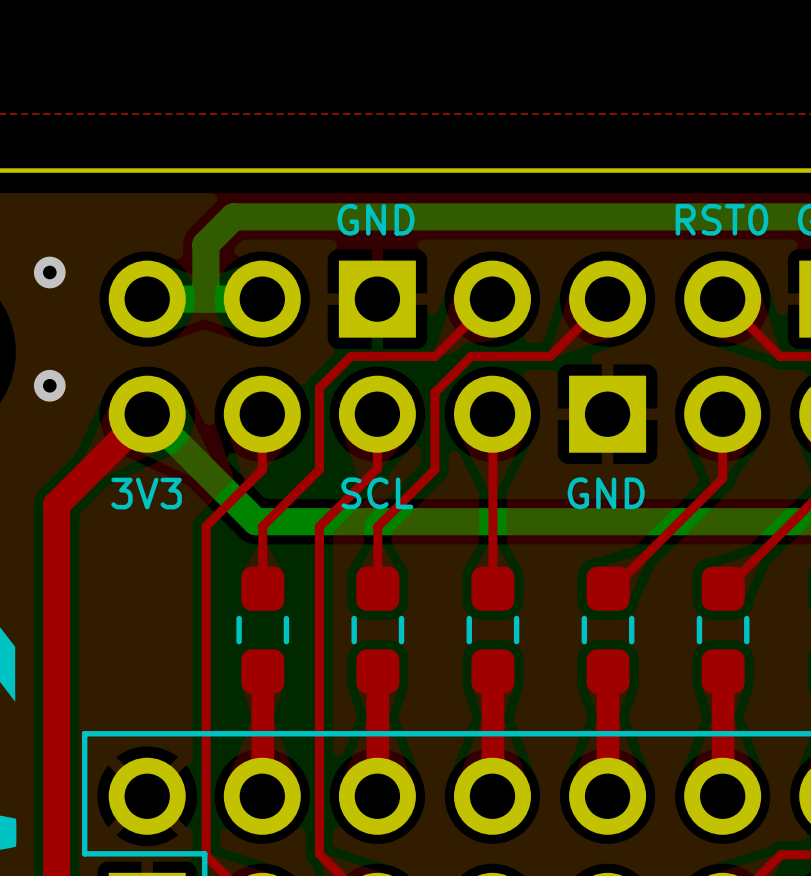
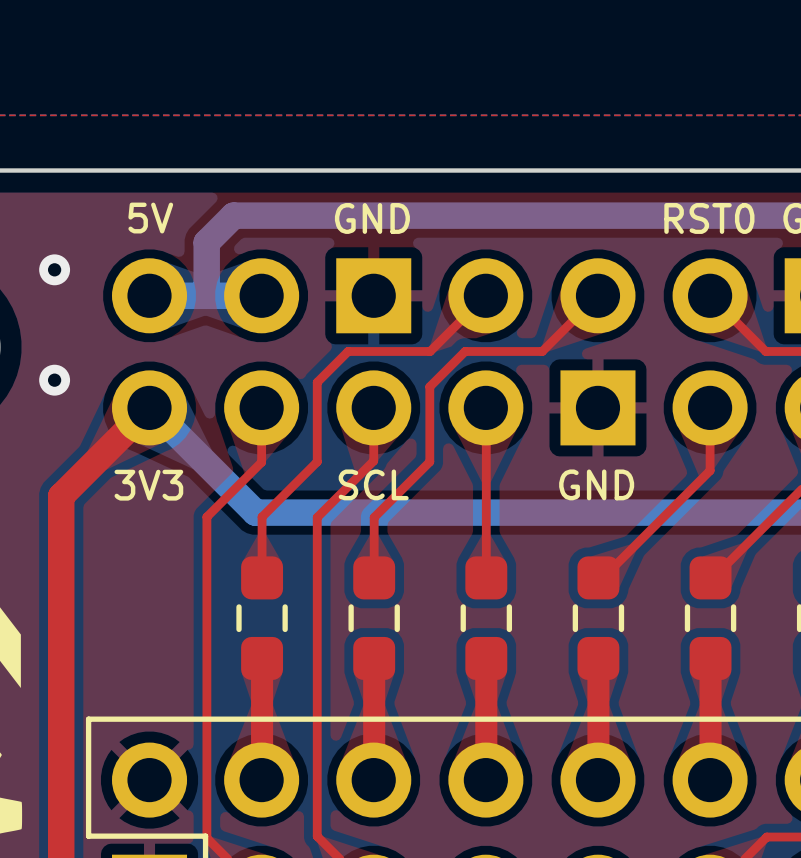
text: none -> 5V (150, 218)

